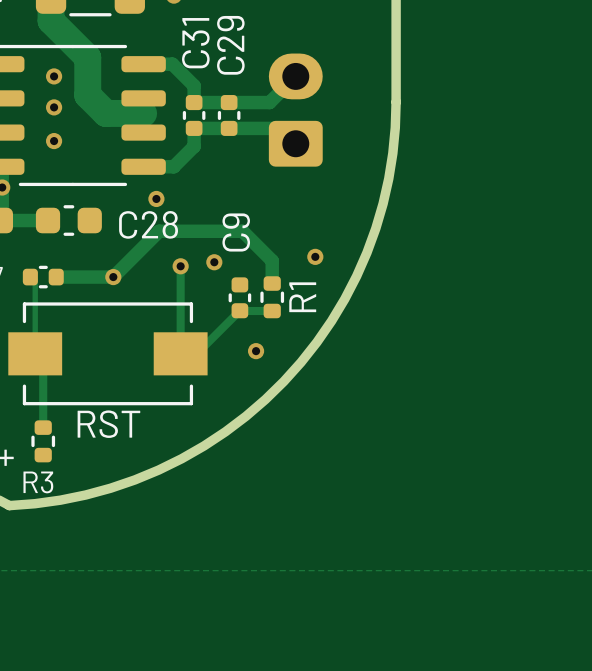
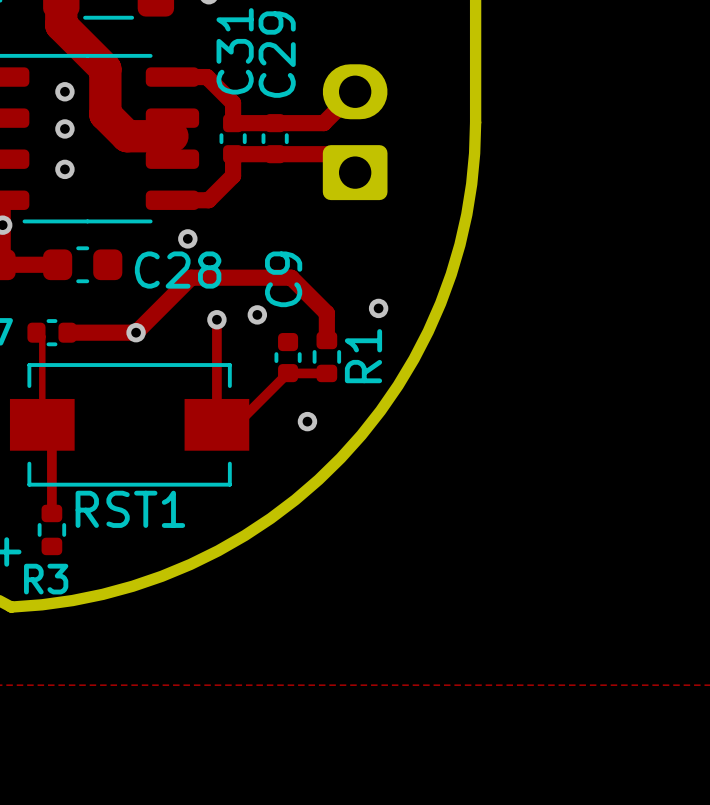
RST name: RST (108, 424) -> RST1 (130, 509)

